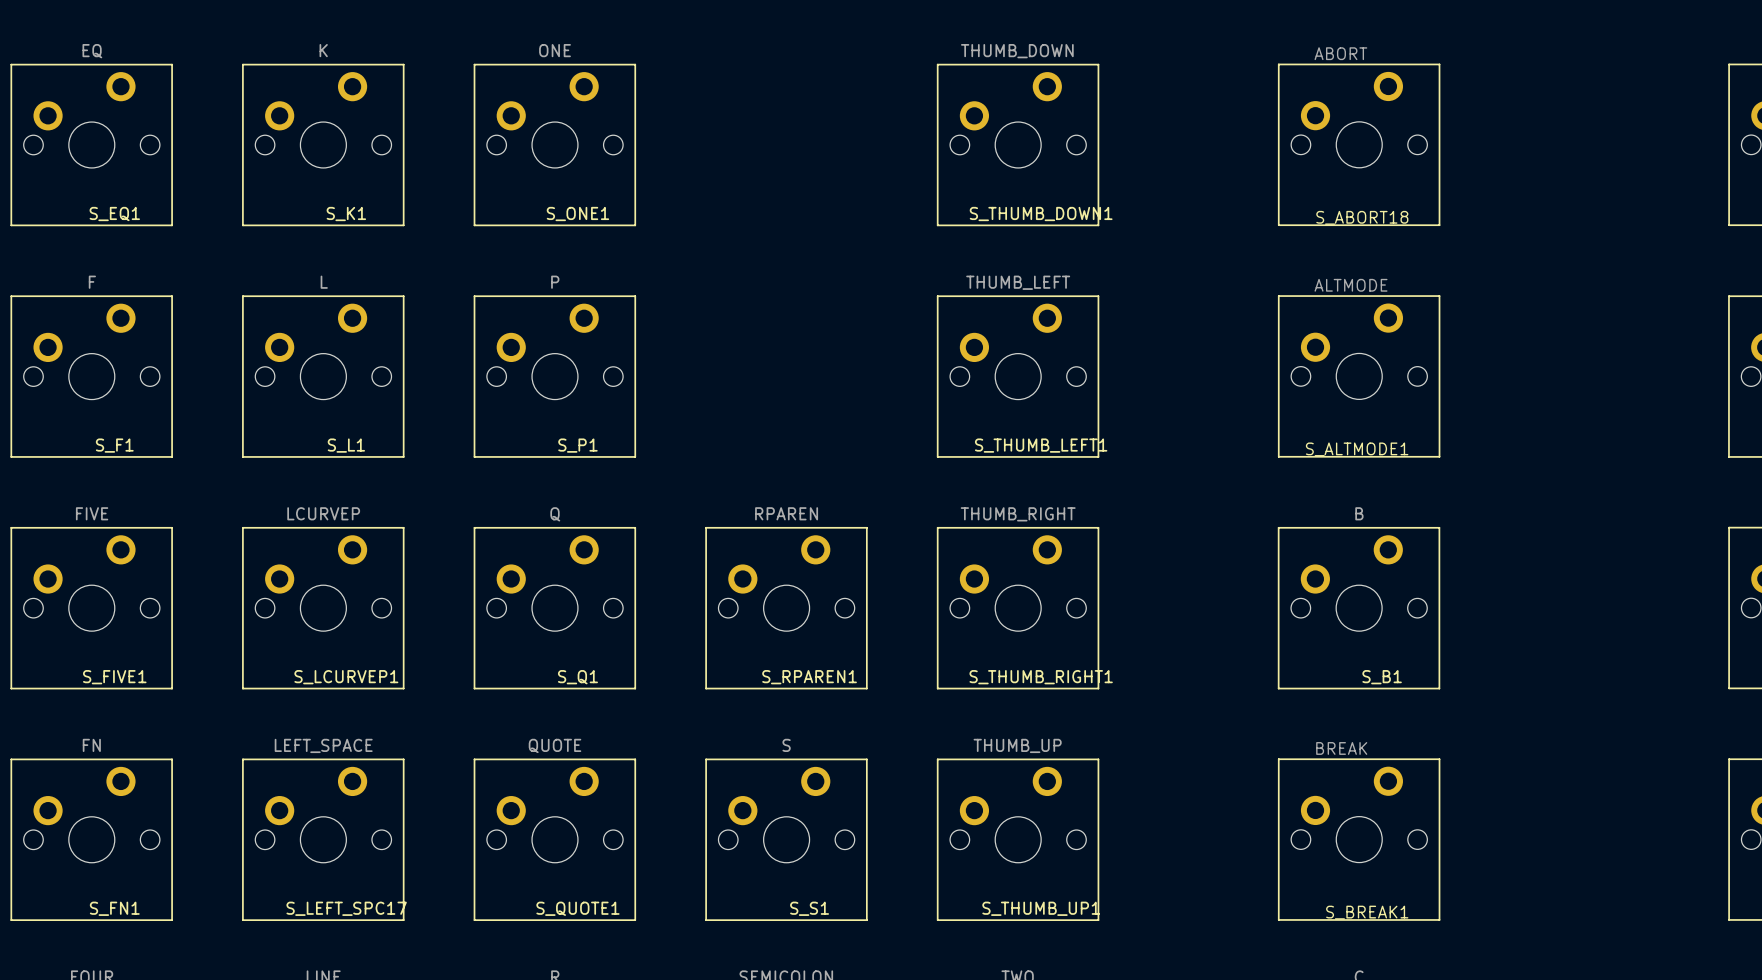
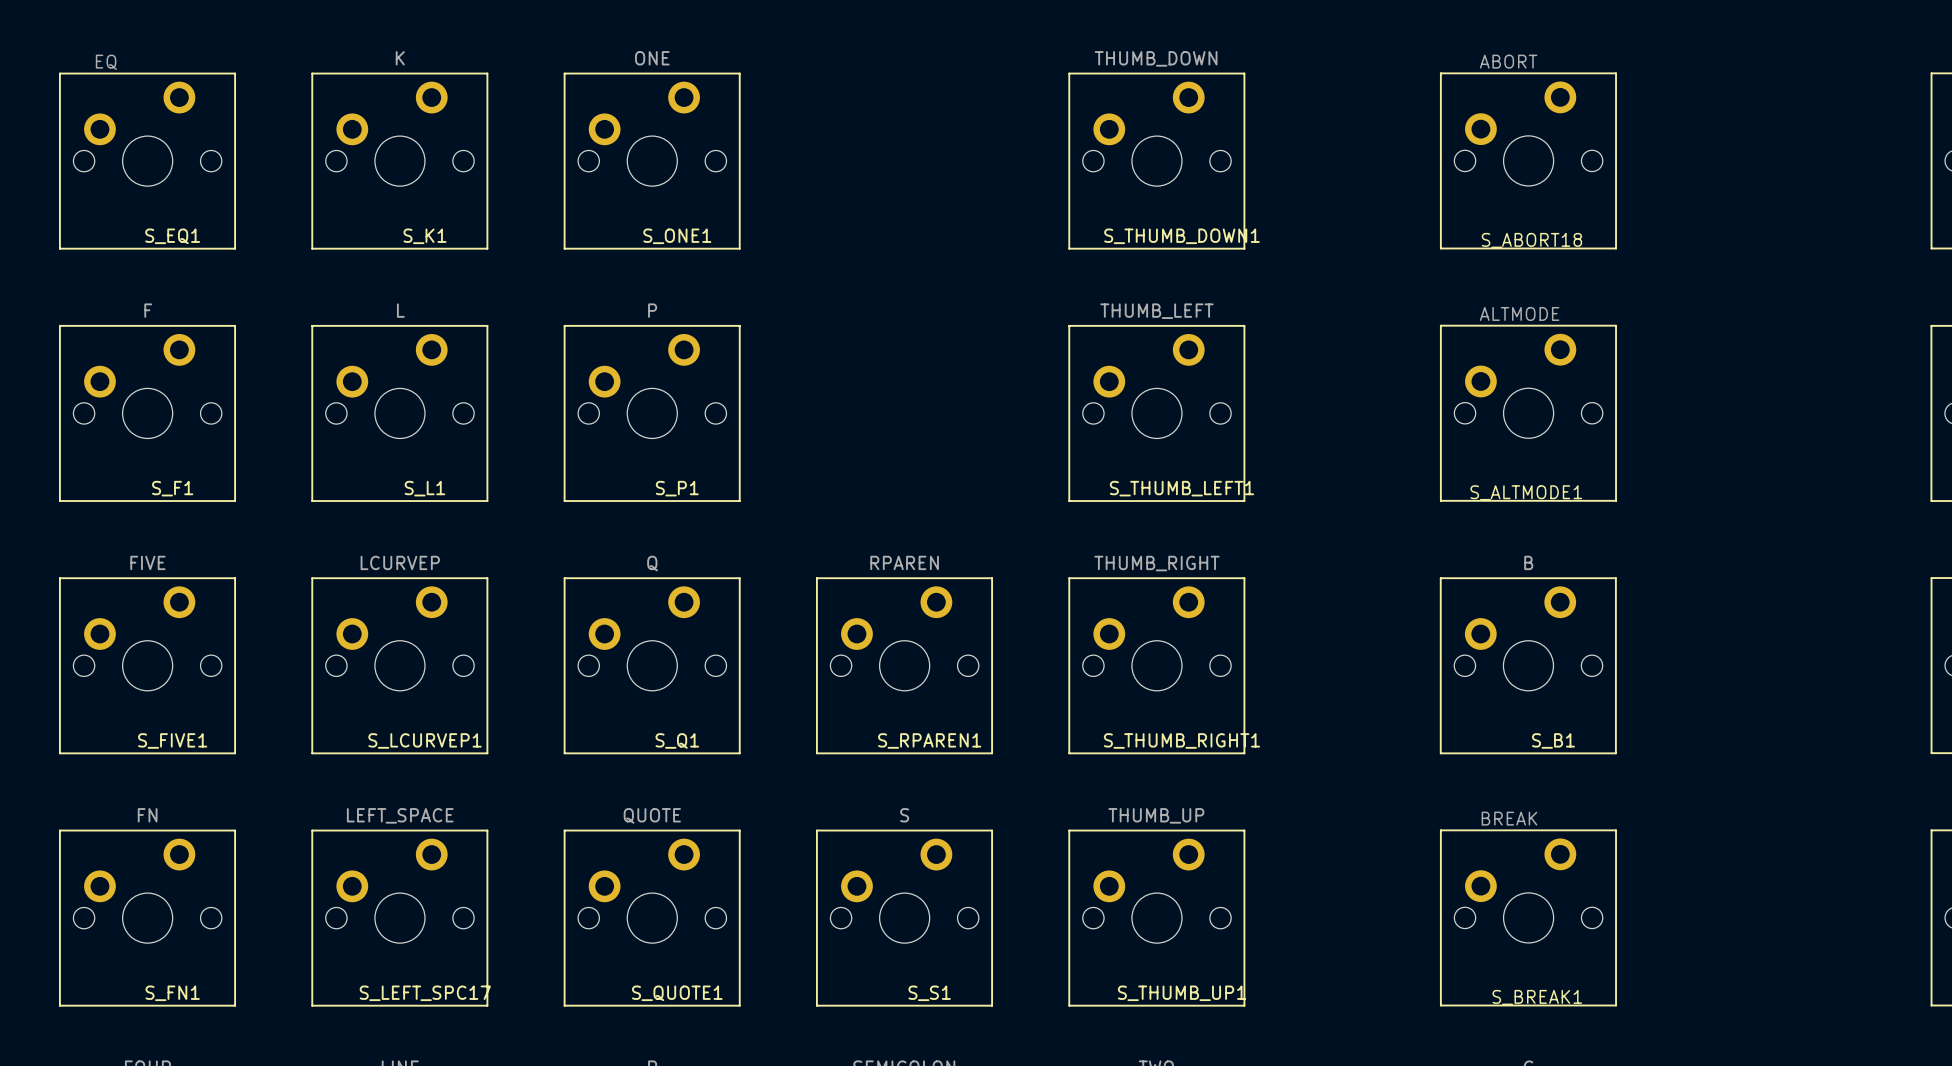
S_EQ1 value position: EQ (92, 51) -> EQ (106, 62)

